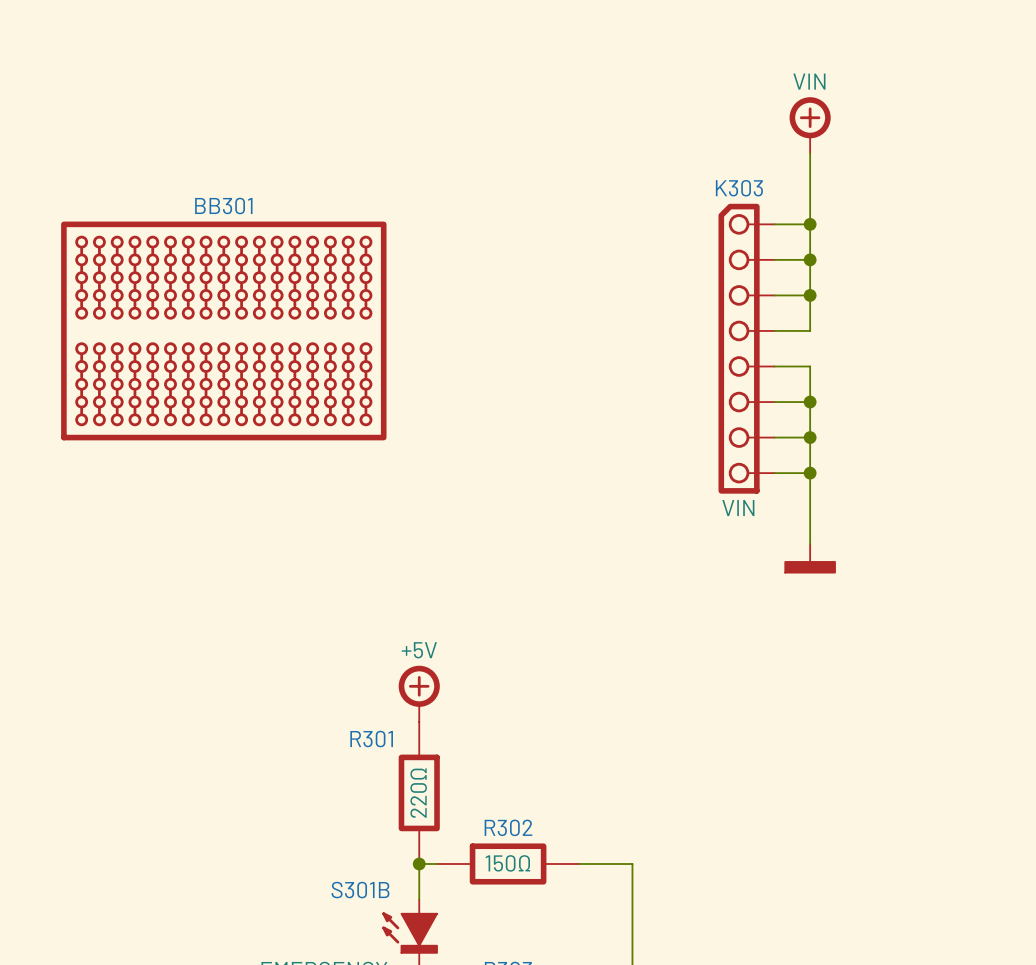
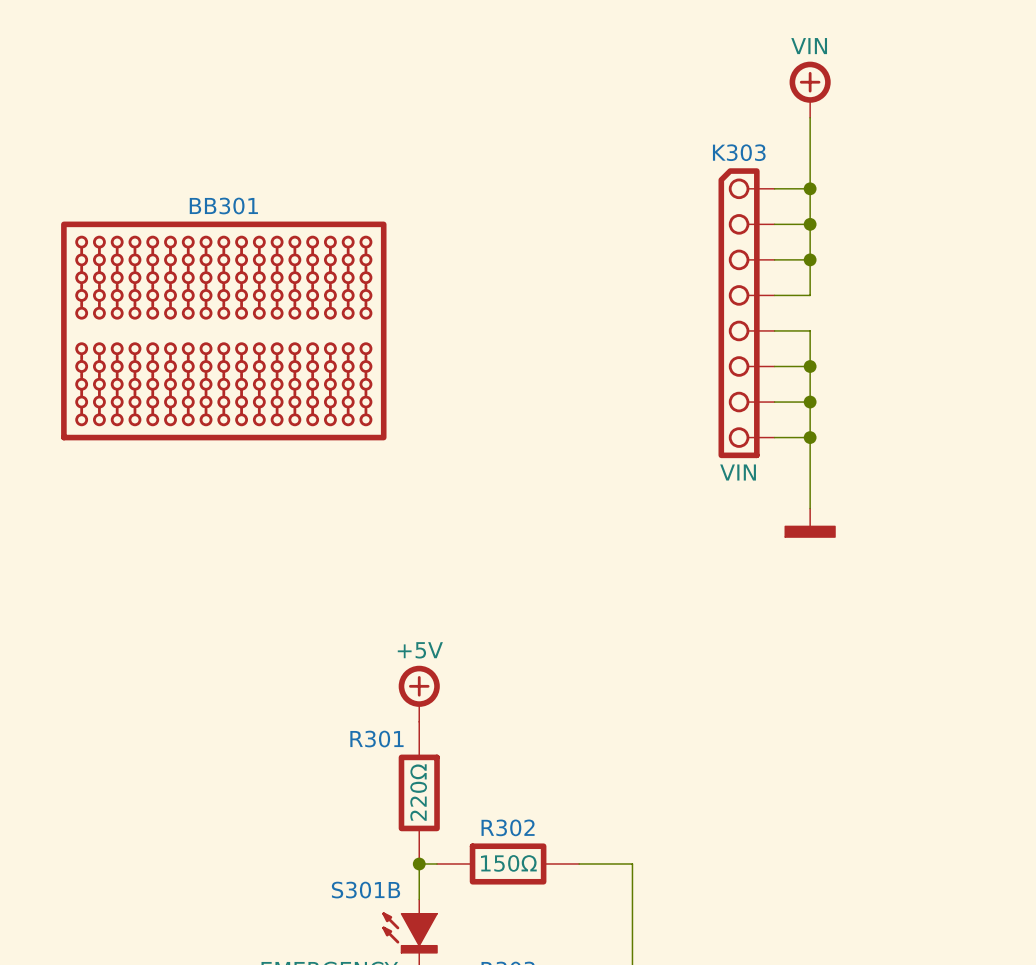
power symbol position: (810, 125) -> (810, 89)
junction: none -> (810, 188)
wire: (810, 295) (810, 330) -> (810, 366) (810, 330)
junction: (810, 295) -> none
K303 position: (746, 348) -> (746, 313)
junction: none -> (810, 366)
wire: (774, 473) (810, 473) -> (774, 188) (810, 188)
junction: (810, 473) -> none
power symbol position: (810, 558) -> (810, 522)

